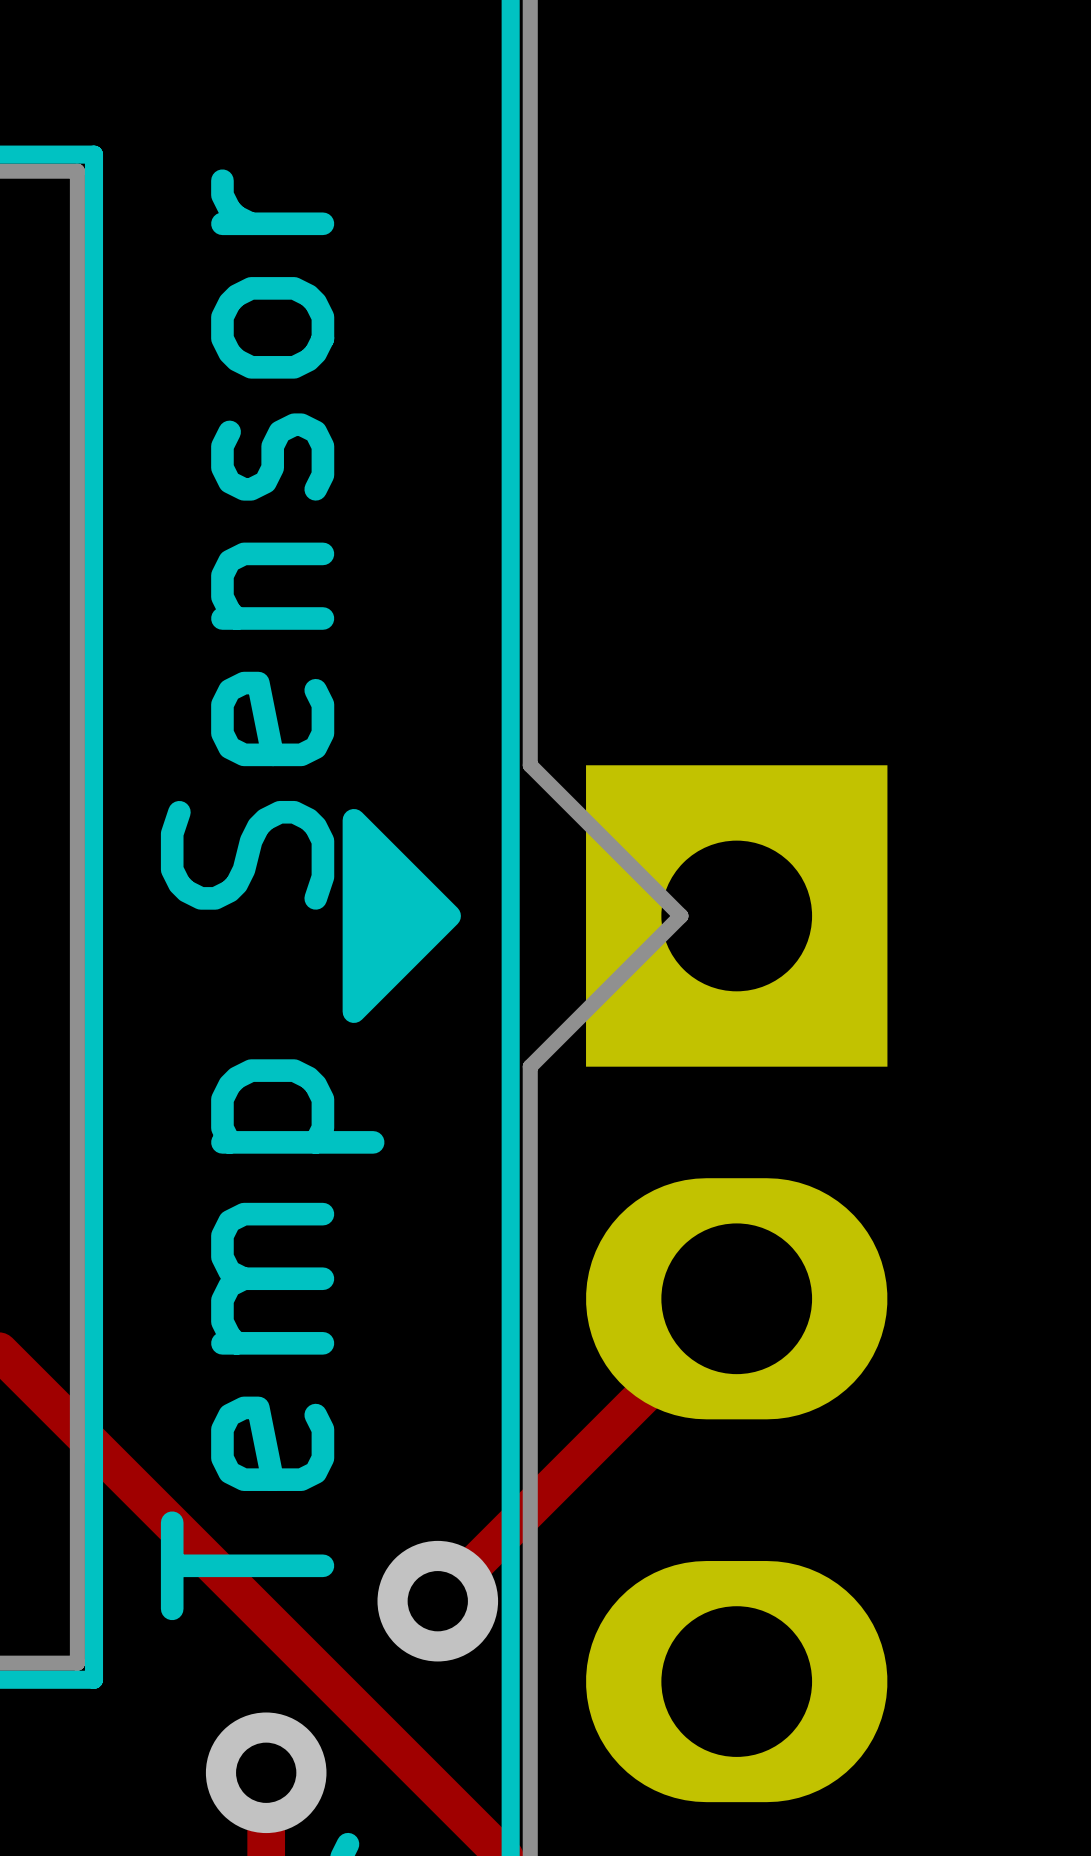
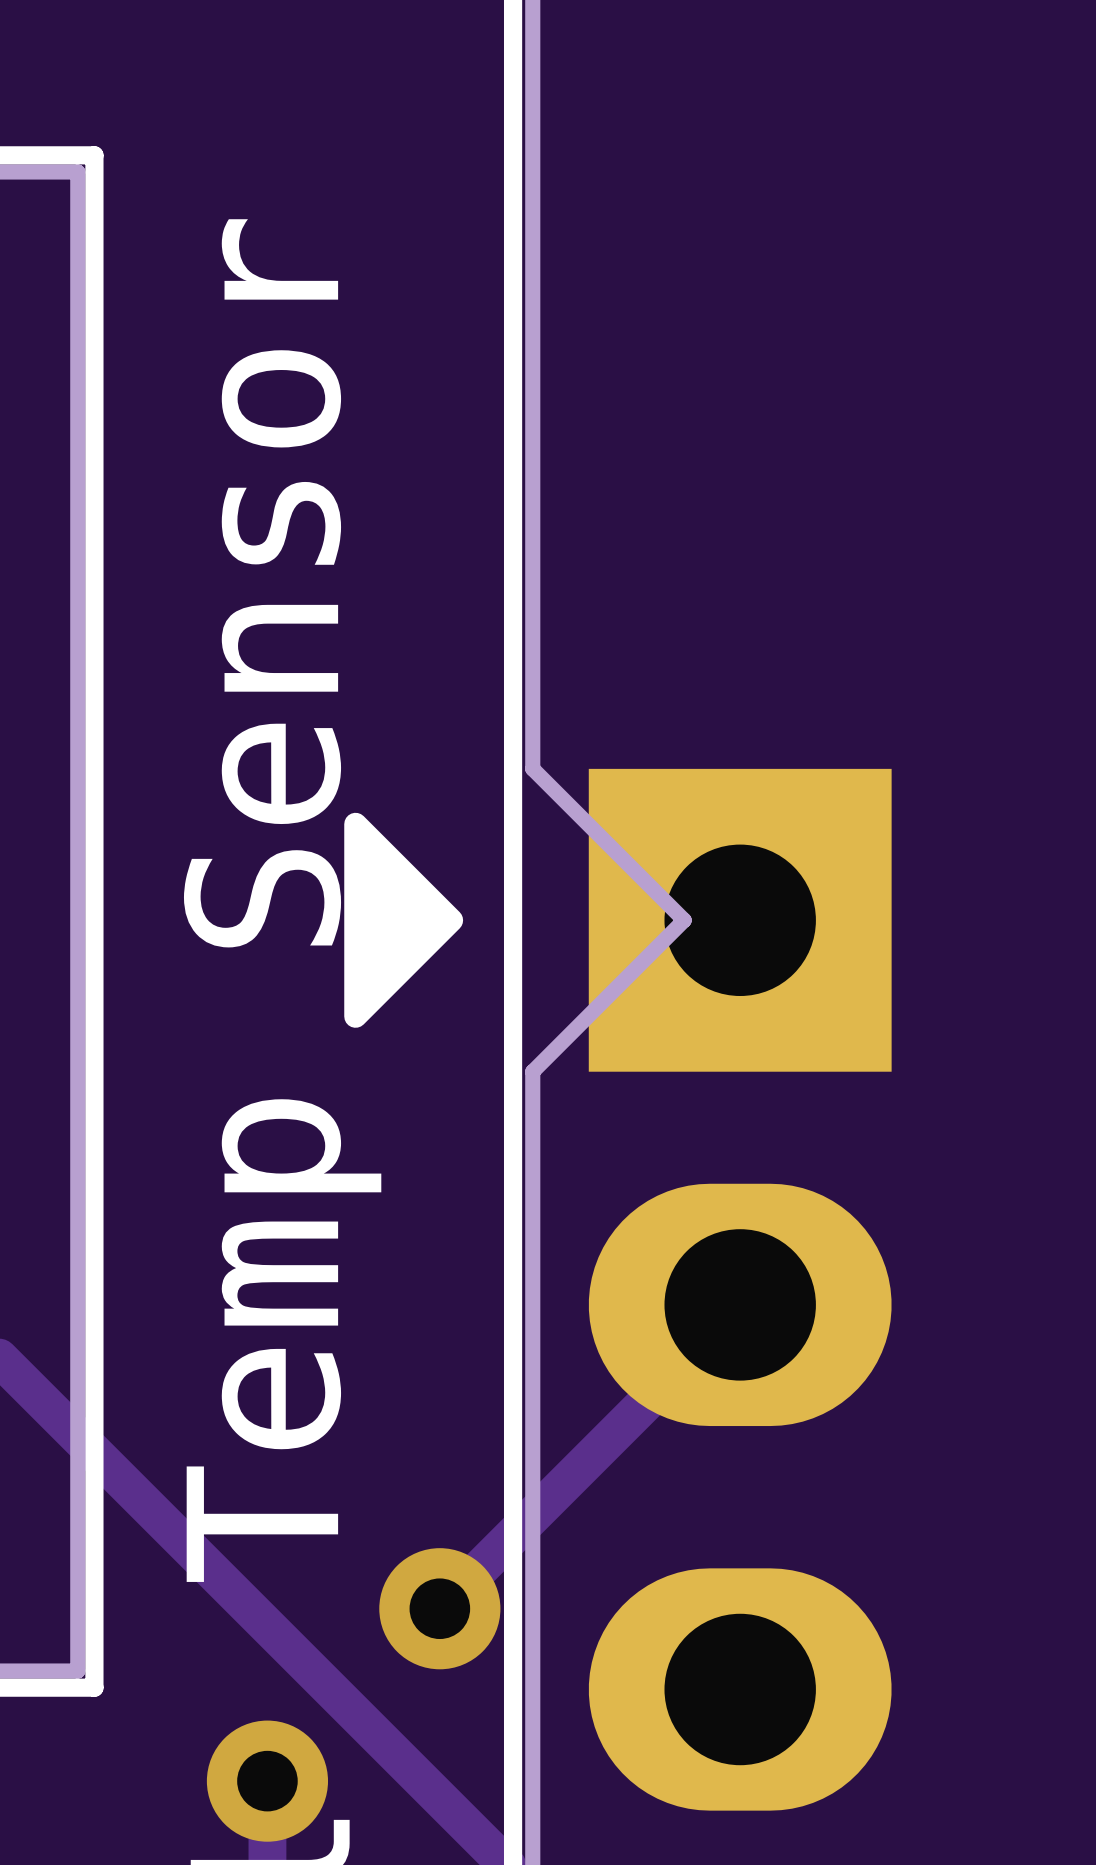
part value position: Temp Sensor (272, 894) -> Temp Sensor (282, 900)

